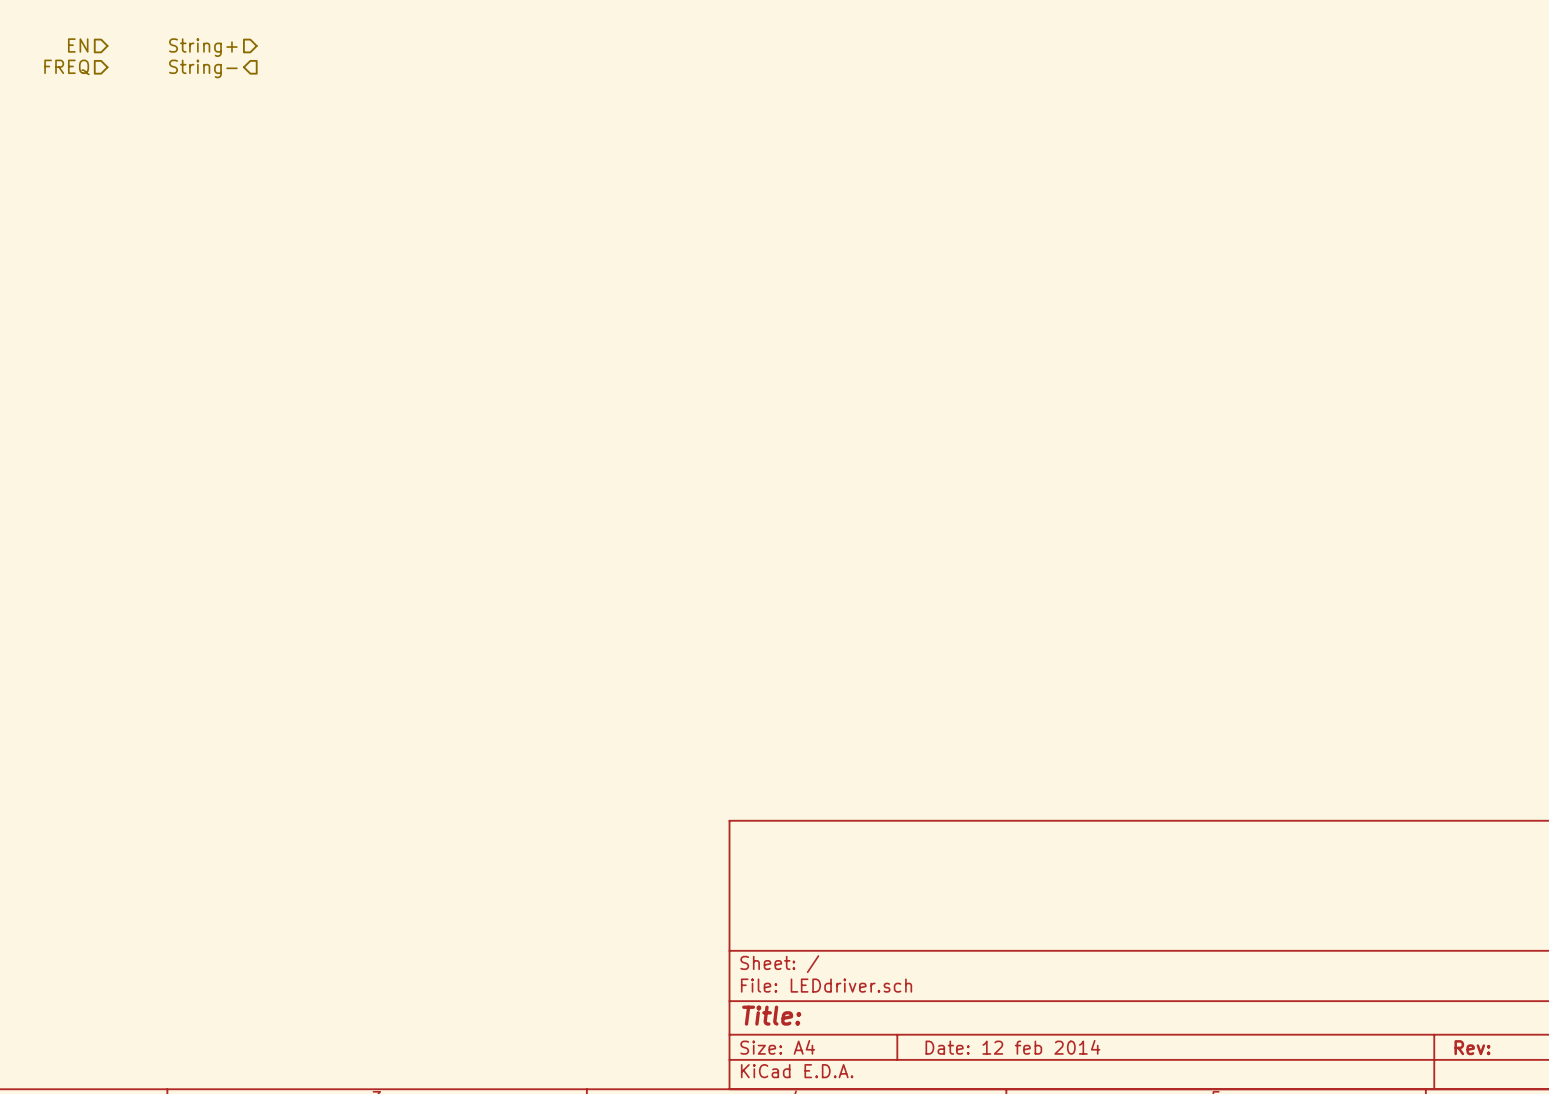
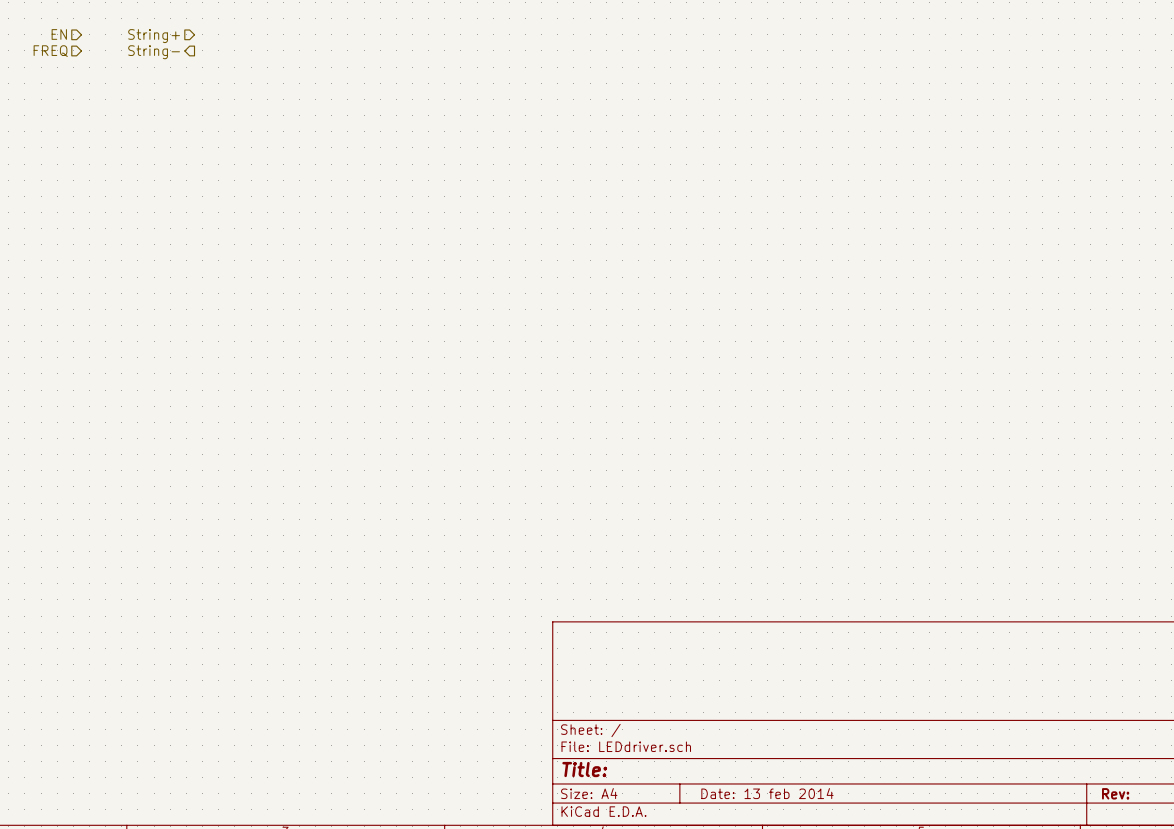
title block: Date: 12 feb 2014 (1012, 1047) -> Date: 13 feb 2014 (767, 793)

